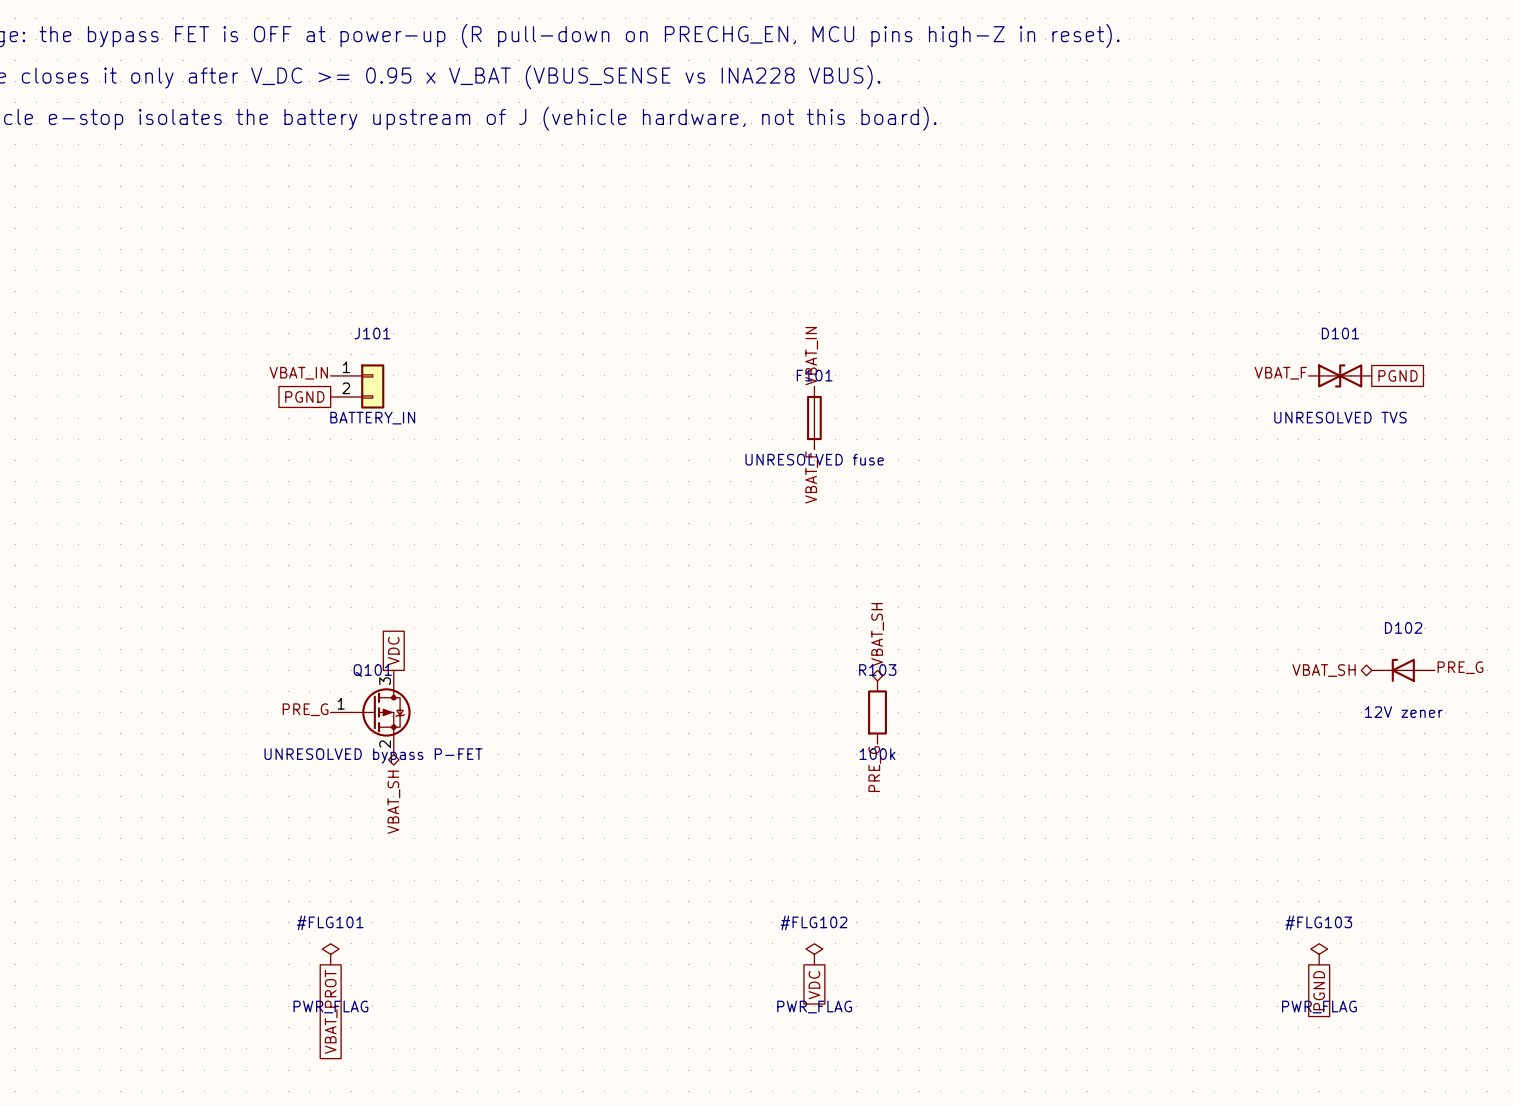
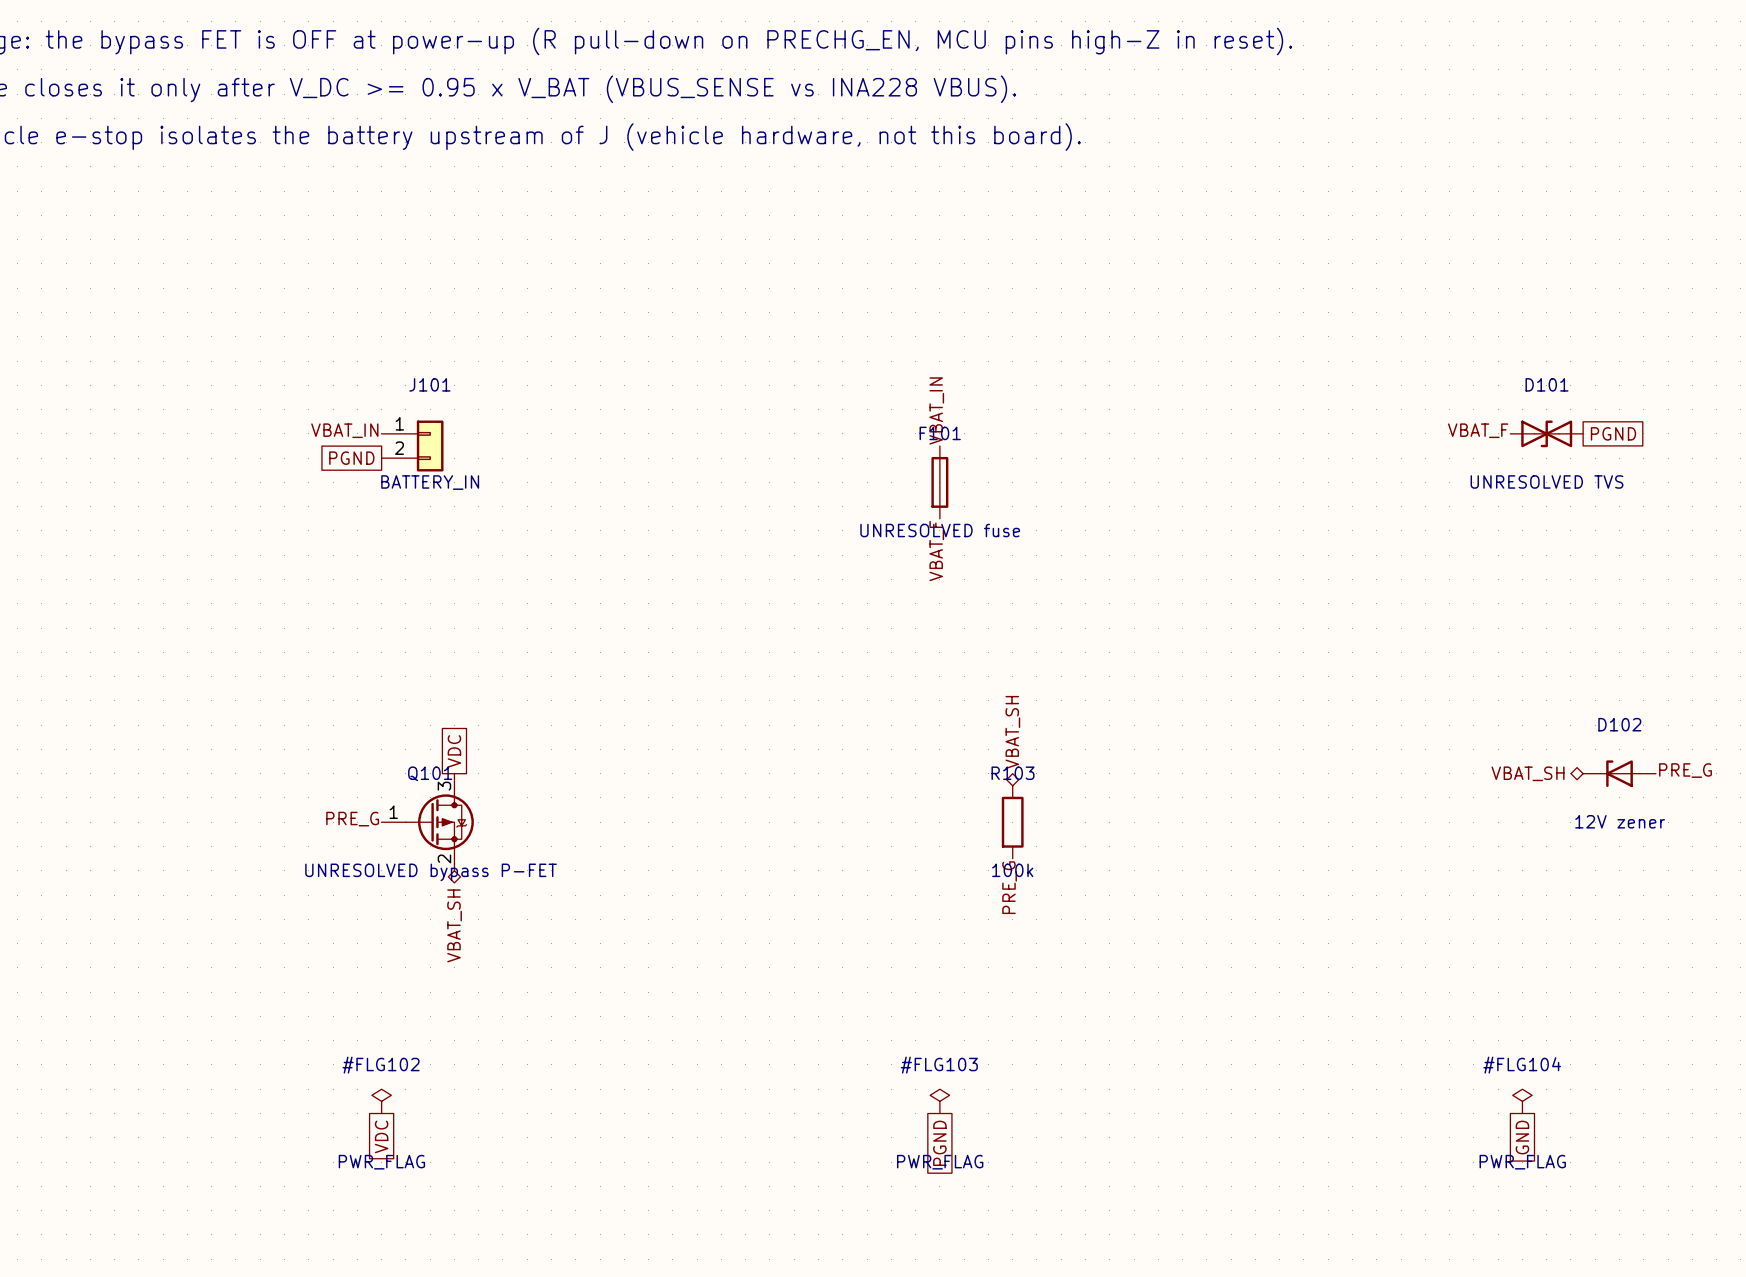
#FLG101 name: #FLG101 (330, 922) -> #FLG102 (381, 1065)
#FLG102 name: #FLG102 (813, 922) -> #FLG103 (939, 1065)
#FLG103 name: #FLG103 (1318, 922) -> #FLG104 (1522, 1065)
global label: VDC (814, 985) -> PGND (939, 1143)
global label: PGND (1319, 990) -> GND (1522, 1137)
global label: VBAT_PROT (331, 1011) -> VDC (381, 1136)

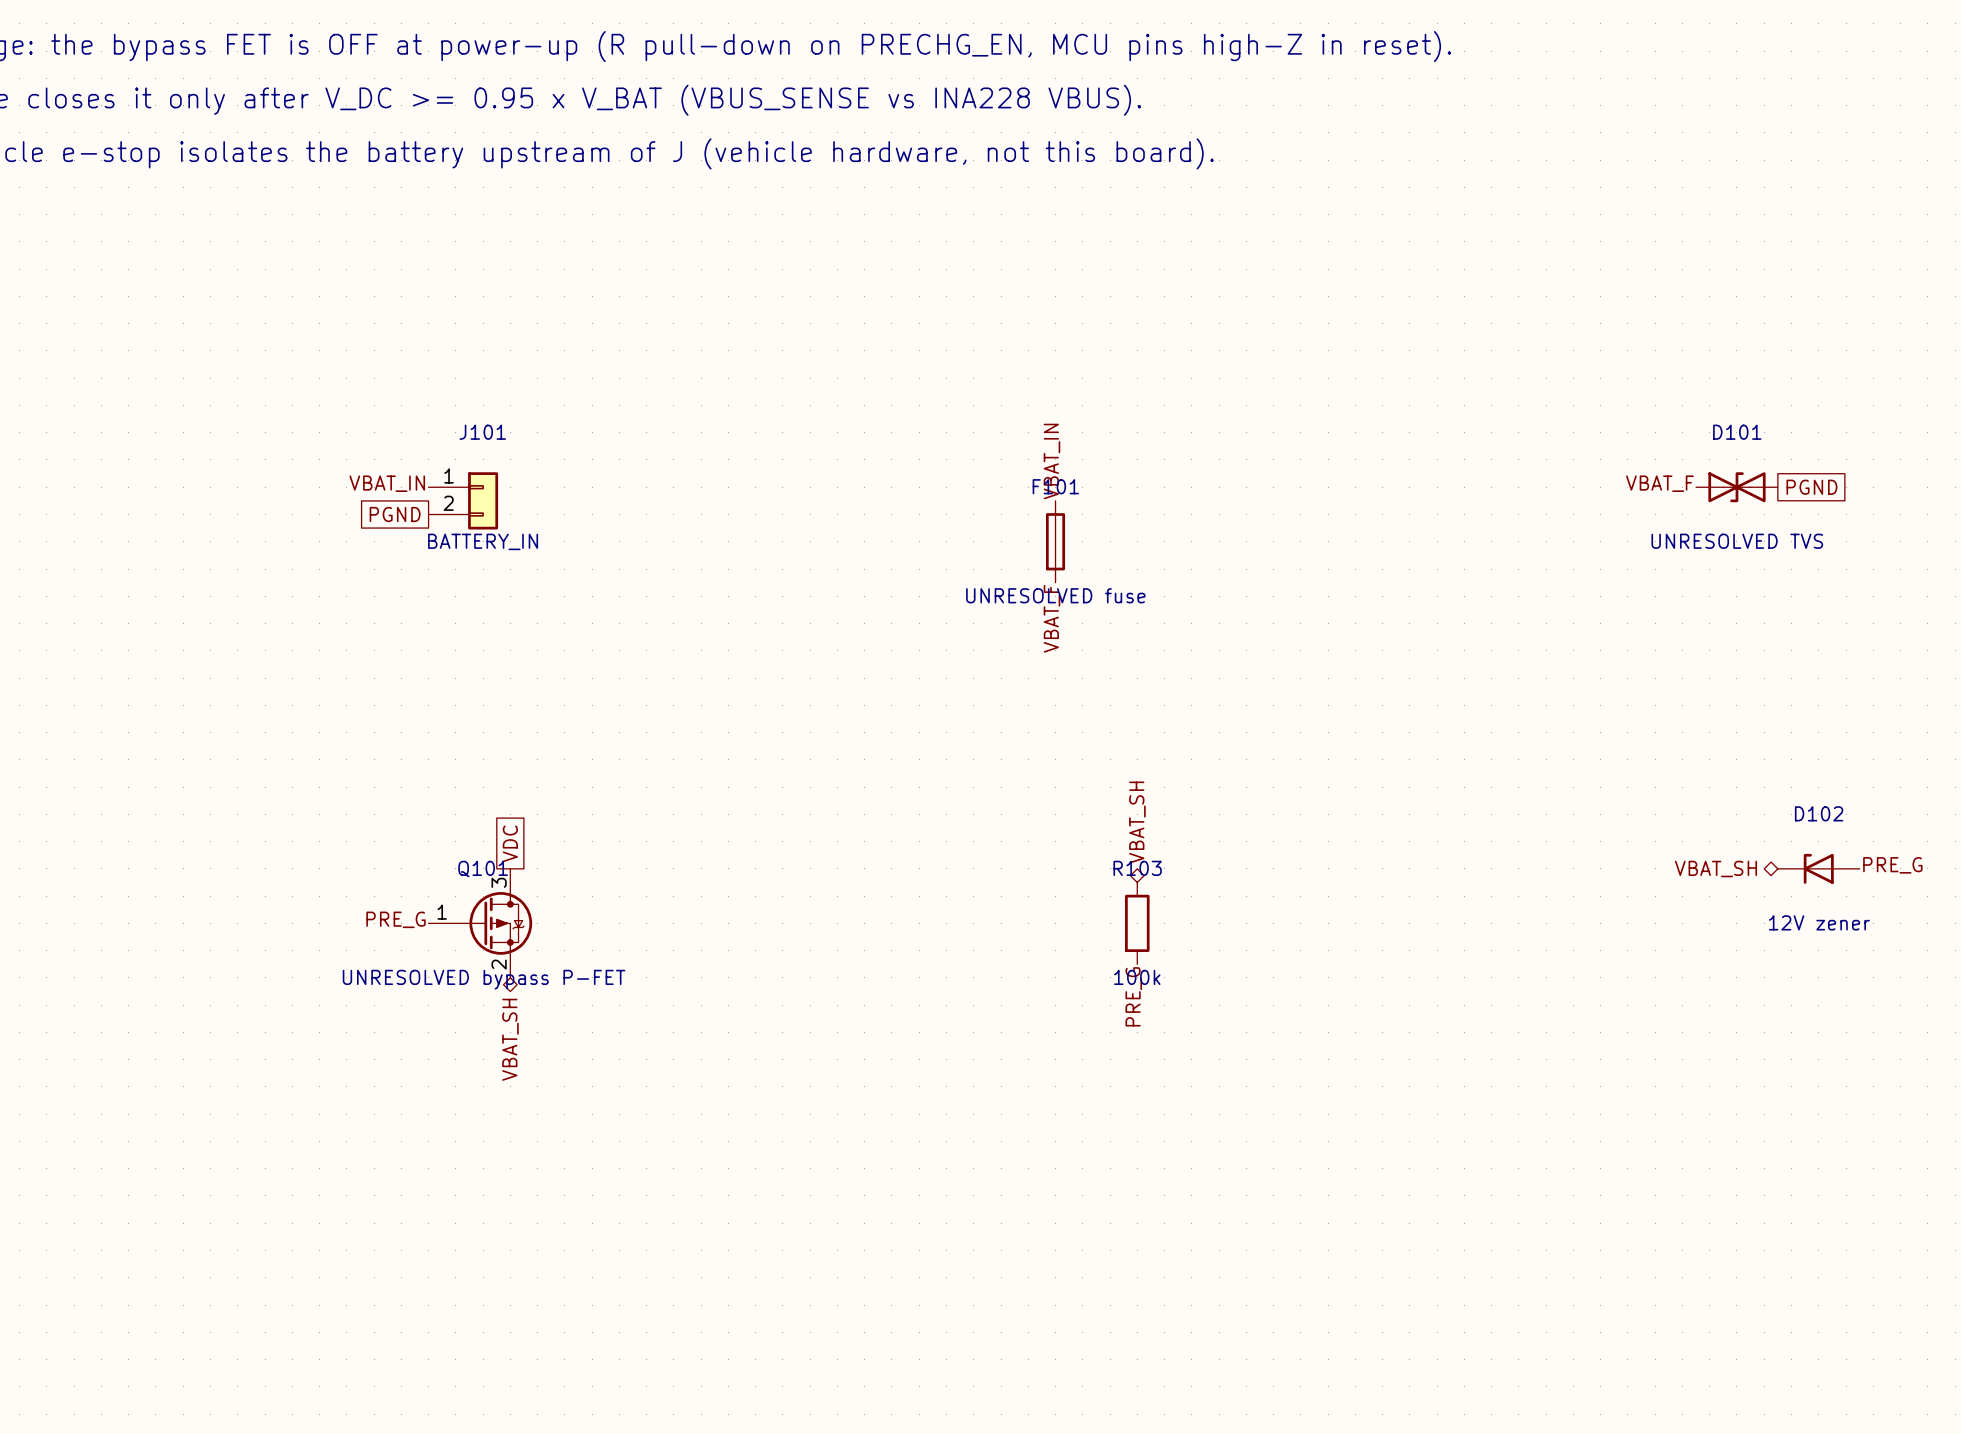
#FLG102: PWR_FLAG (381, 1101) -> none
#FLG103: PWR_FLAG (939, 1101) -> none
#FLG104: PWR_FLAG (1522, 1101) -> none
global label: VDC (381, 1136) -> none
global label: GND (1522, 1137) -> none
global label: PGND (939, 1143) -> none

